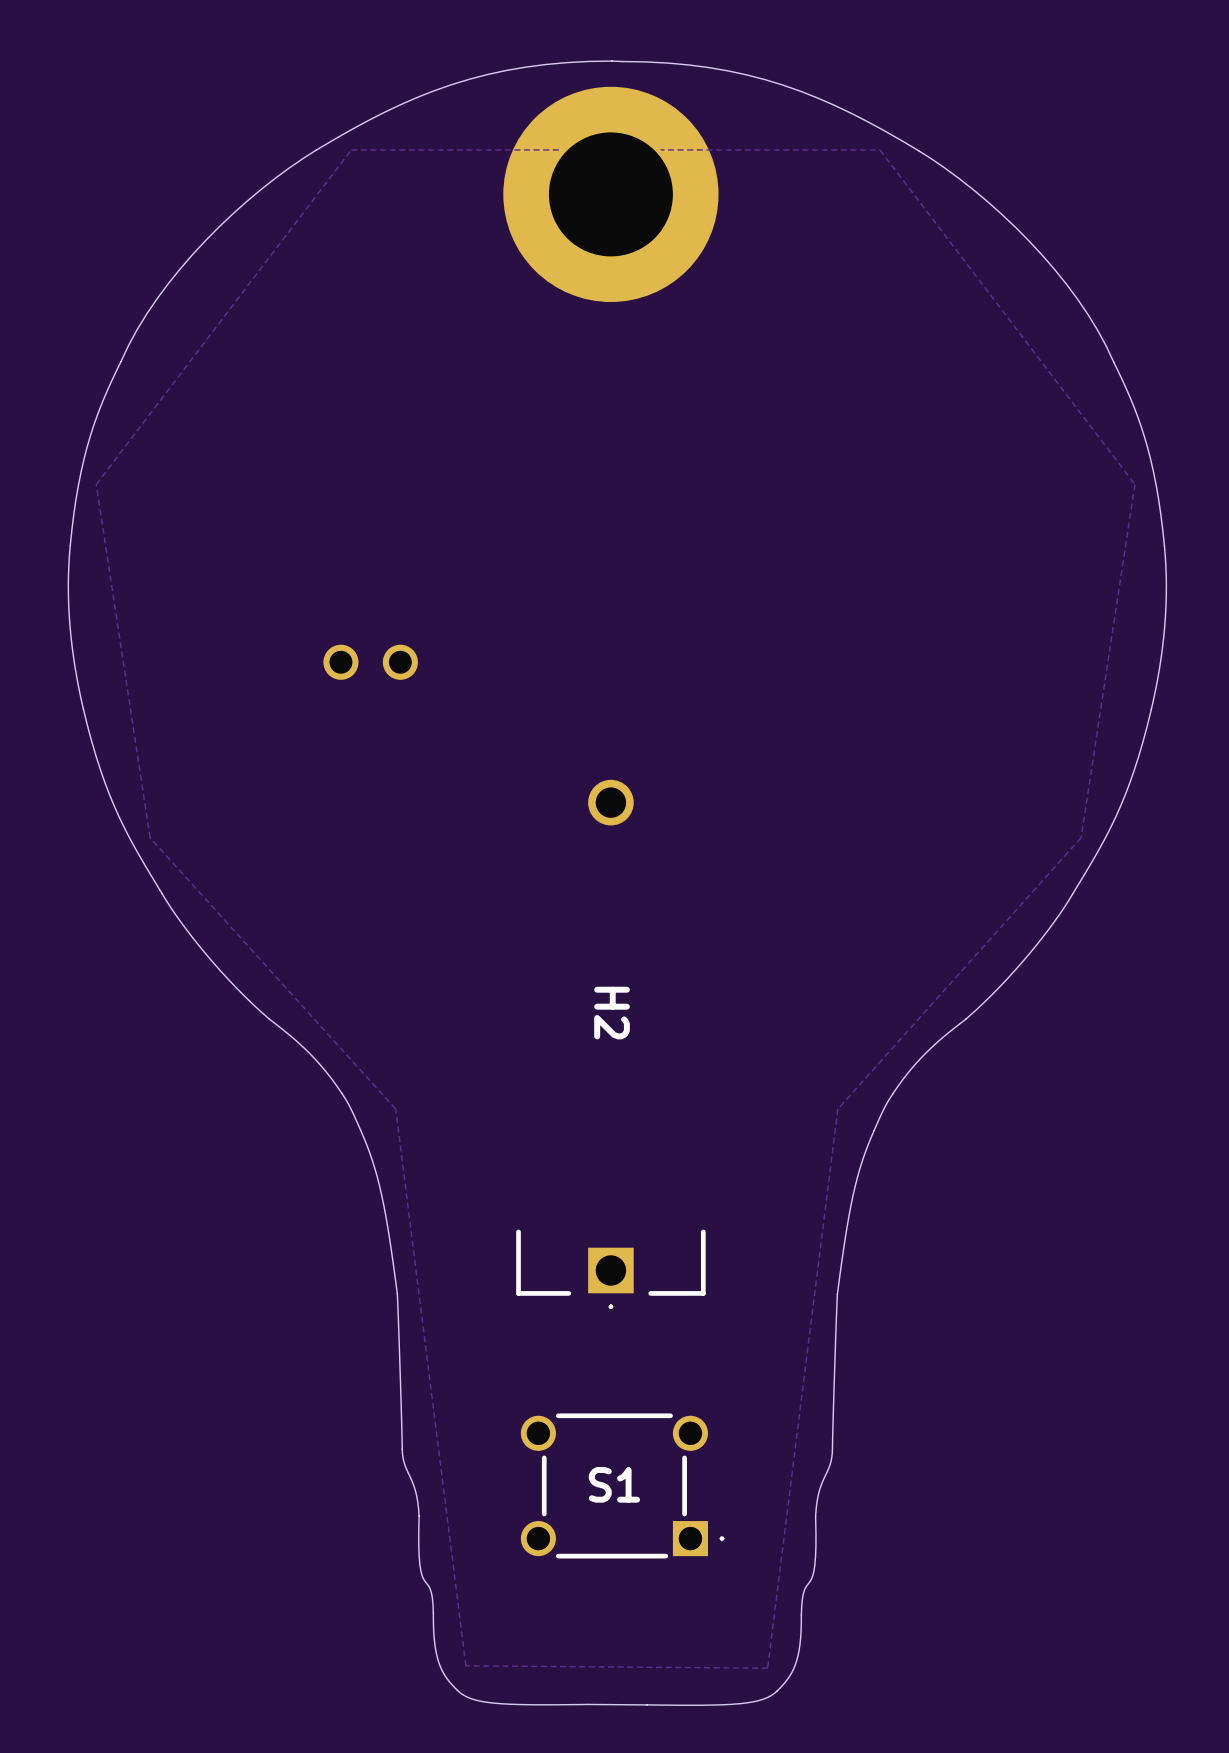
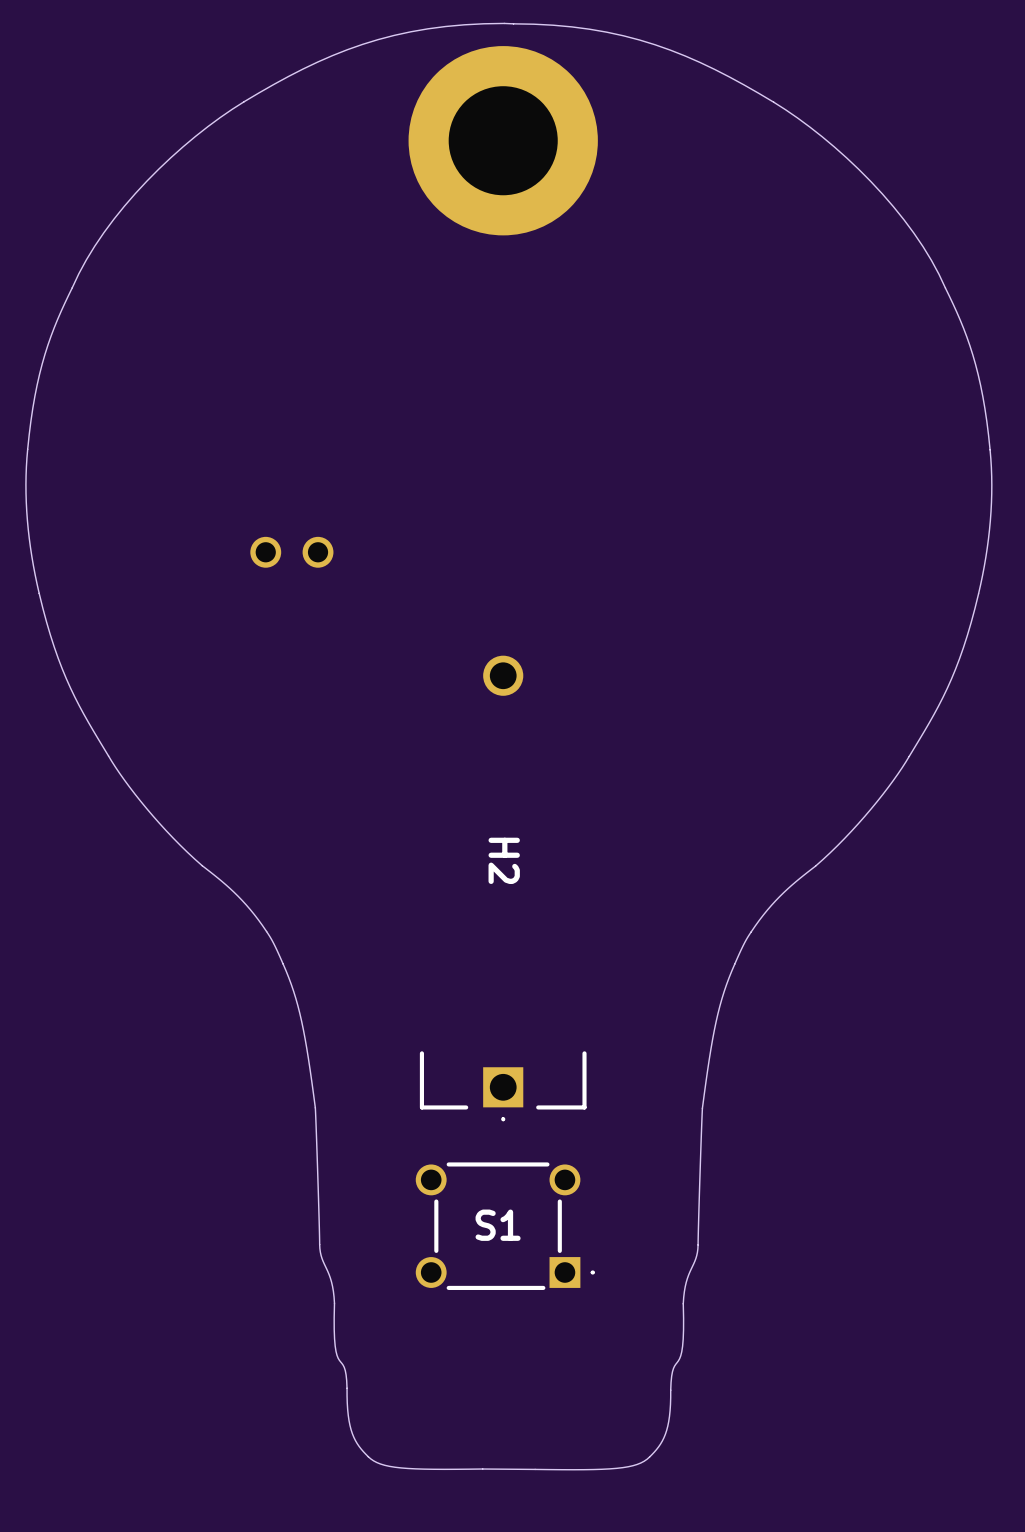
zone outline: (879, 149) (351, 149) (96, 484) (150, 837) (395, 1109) (465, 1665) (767, 1668) (837, 1109) (1081, 837) (1134, 484) (879, 149) -> none
S1 position: (622, 1485) -> (505, 1226)

